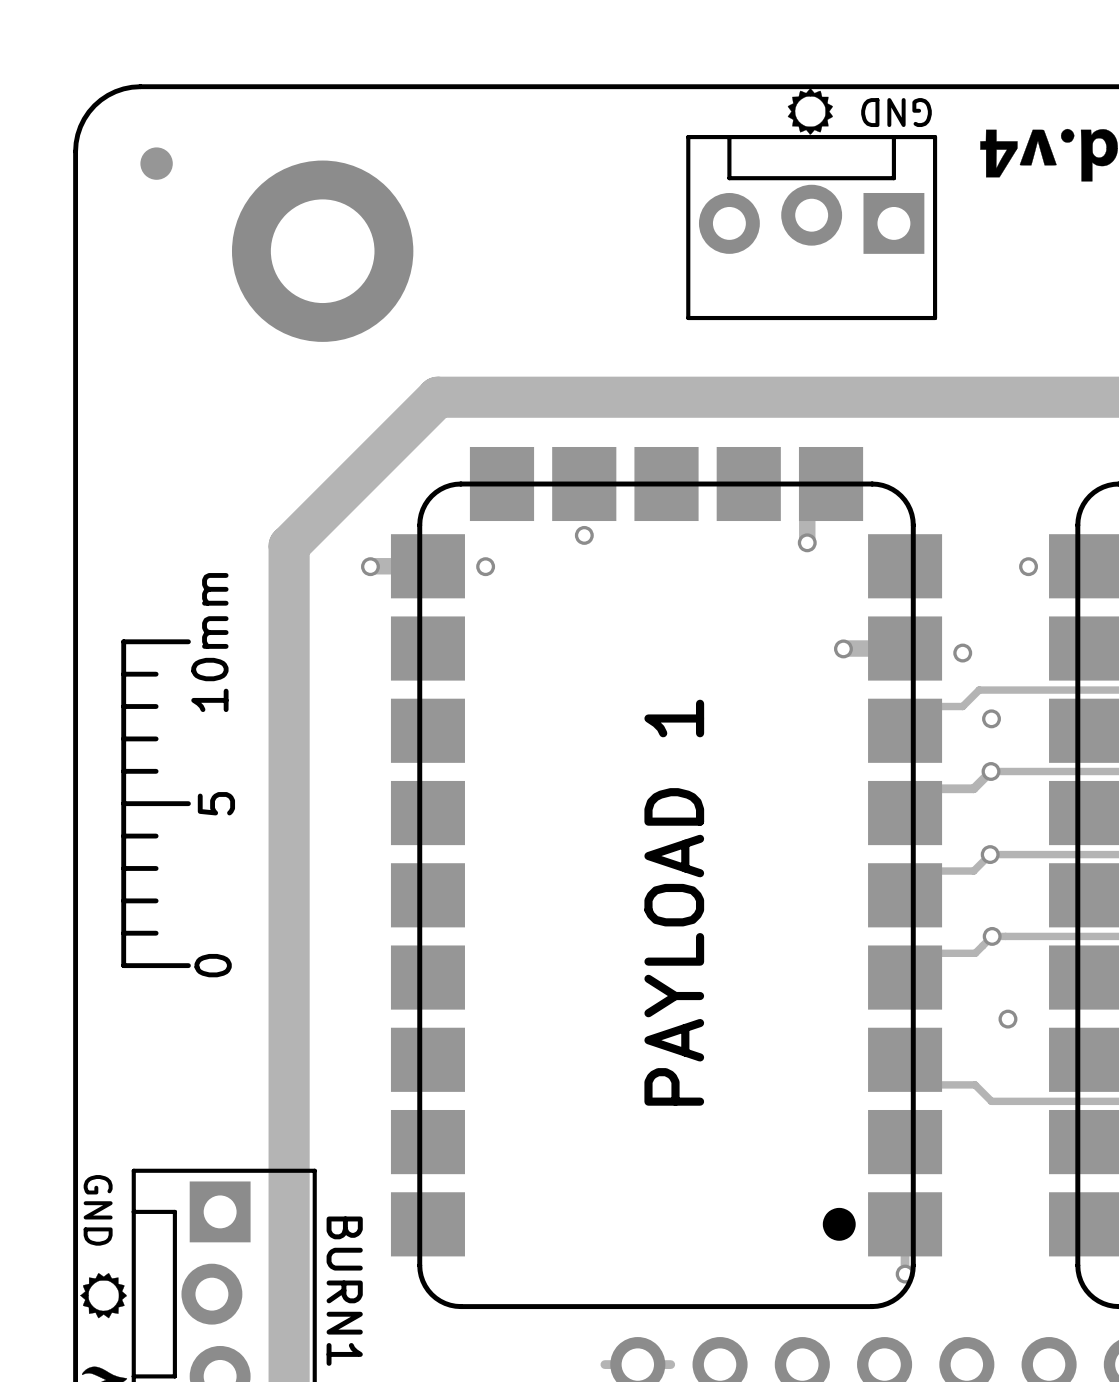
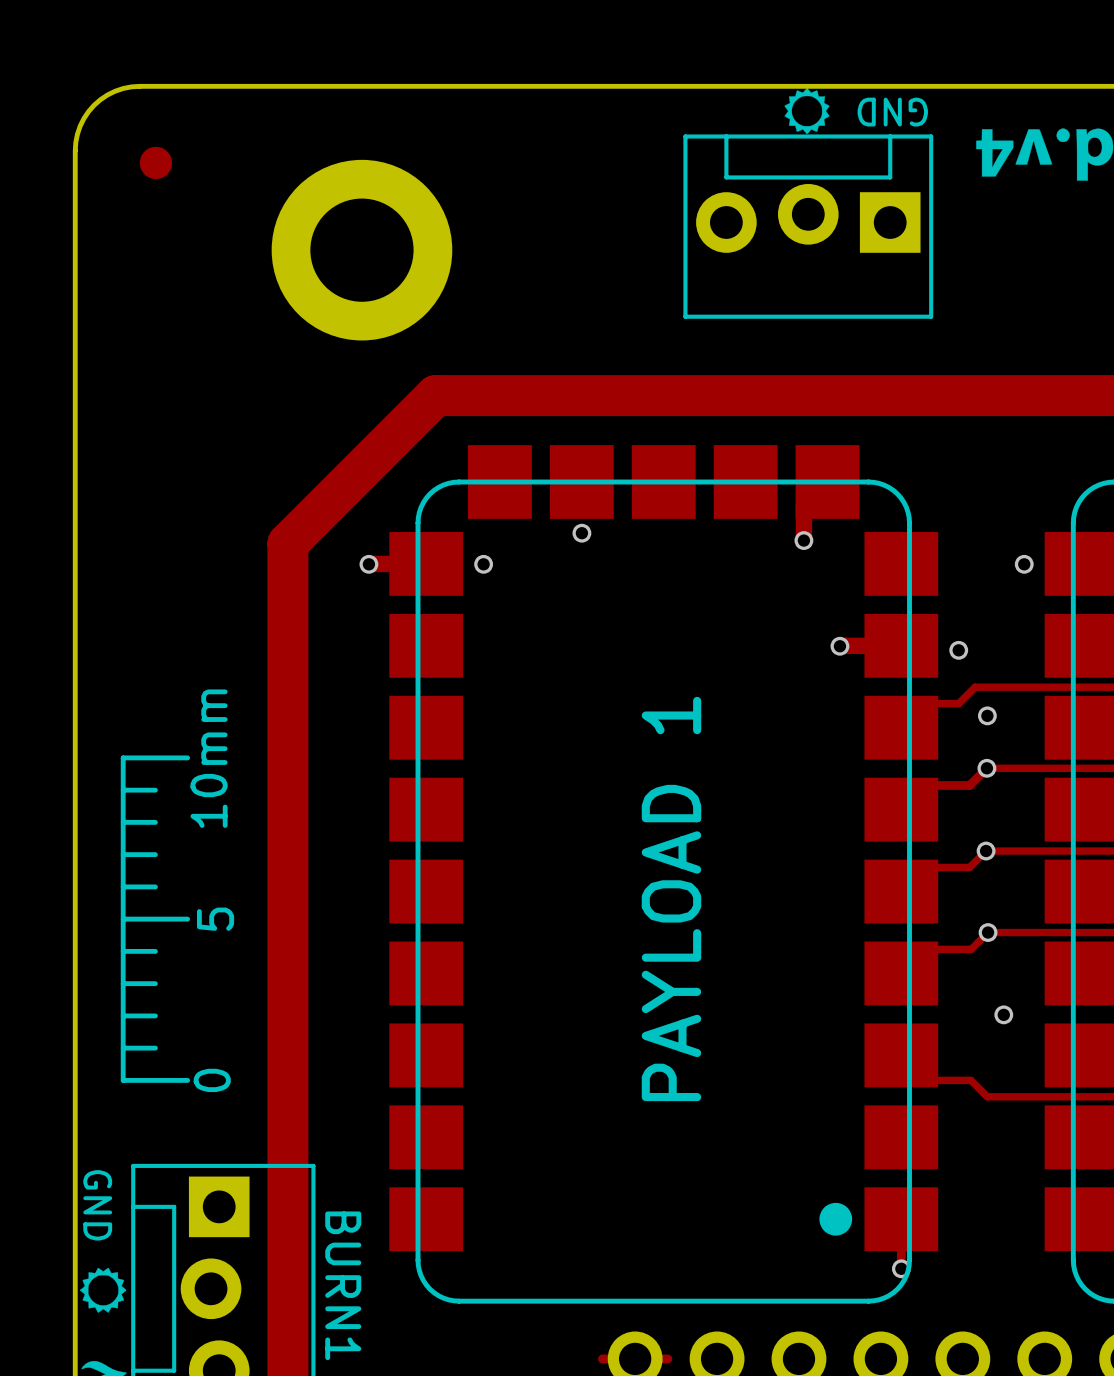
part position: (322, 251) -> (361, 250)
drawing position: (156, 803) -> (155, 919)

